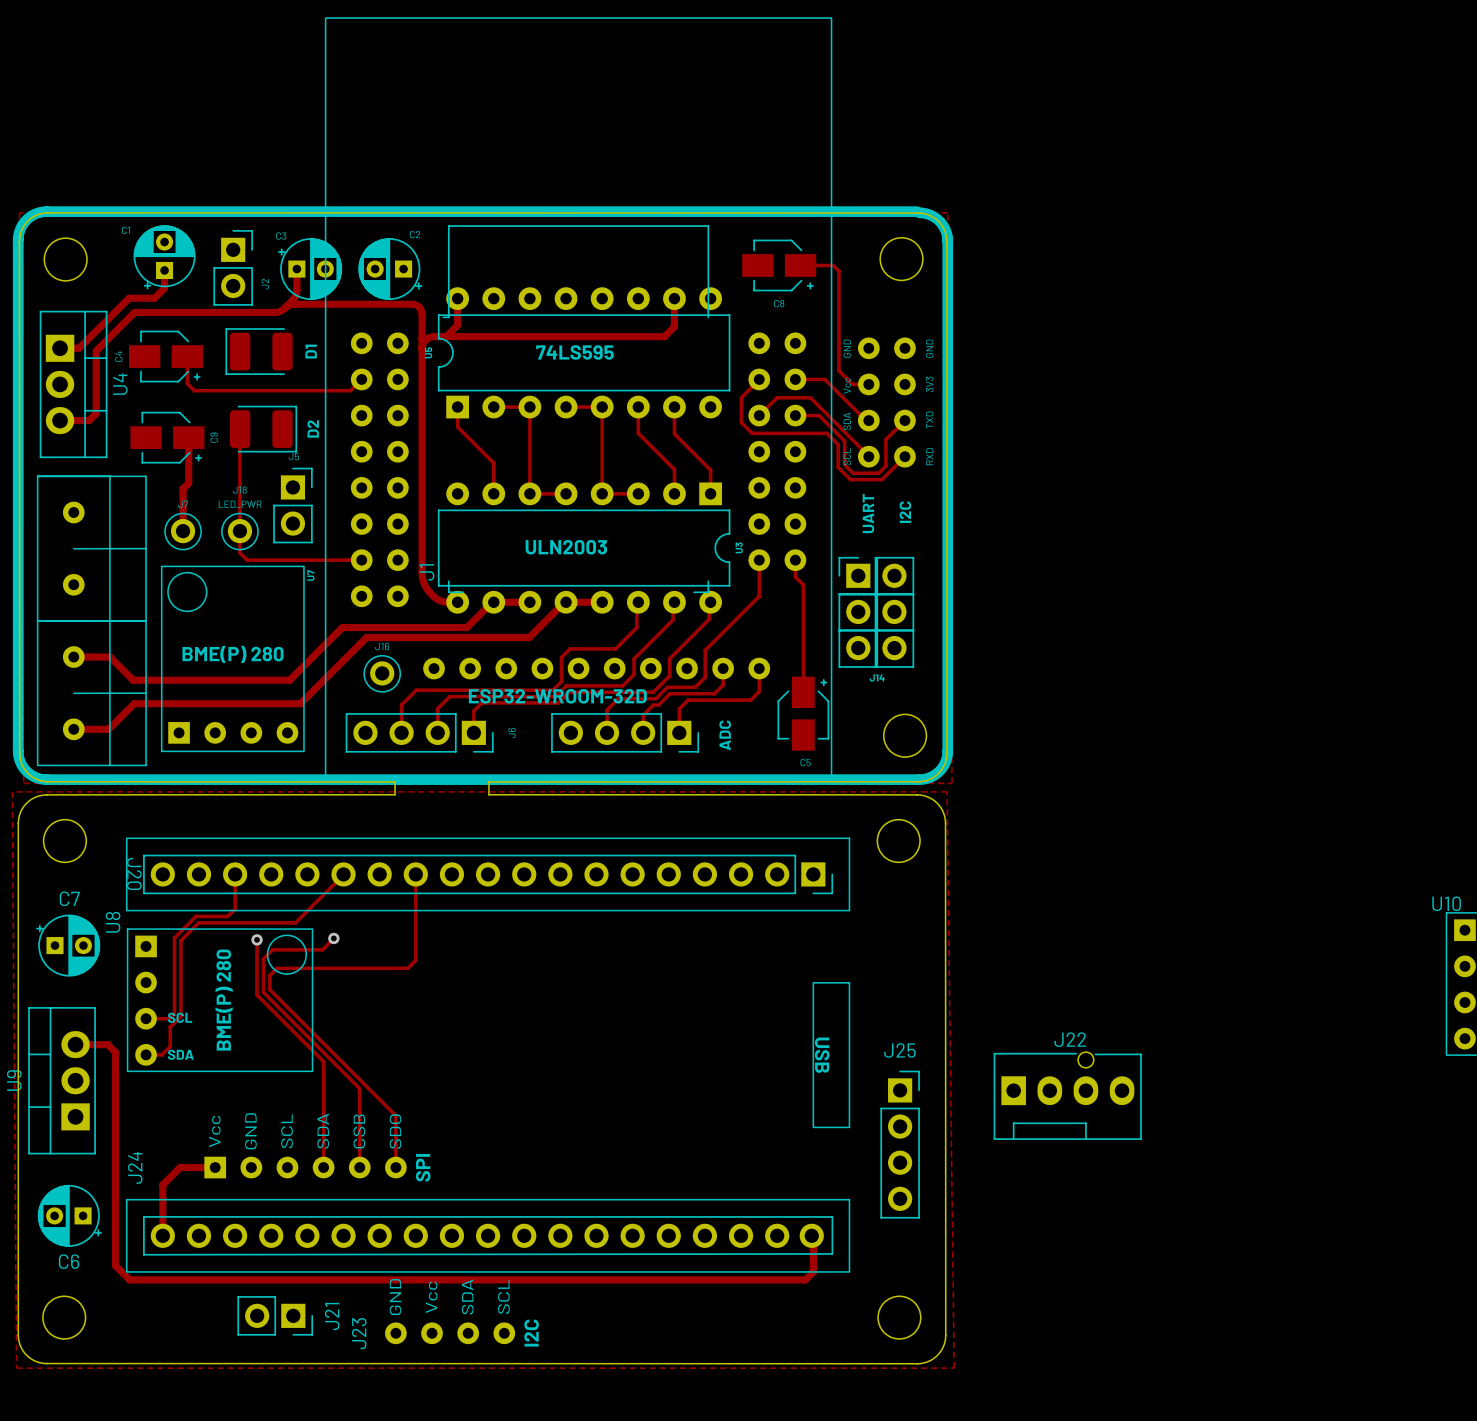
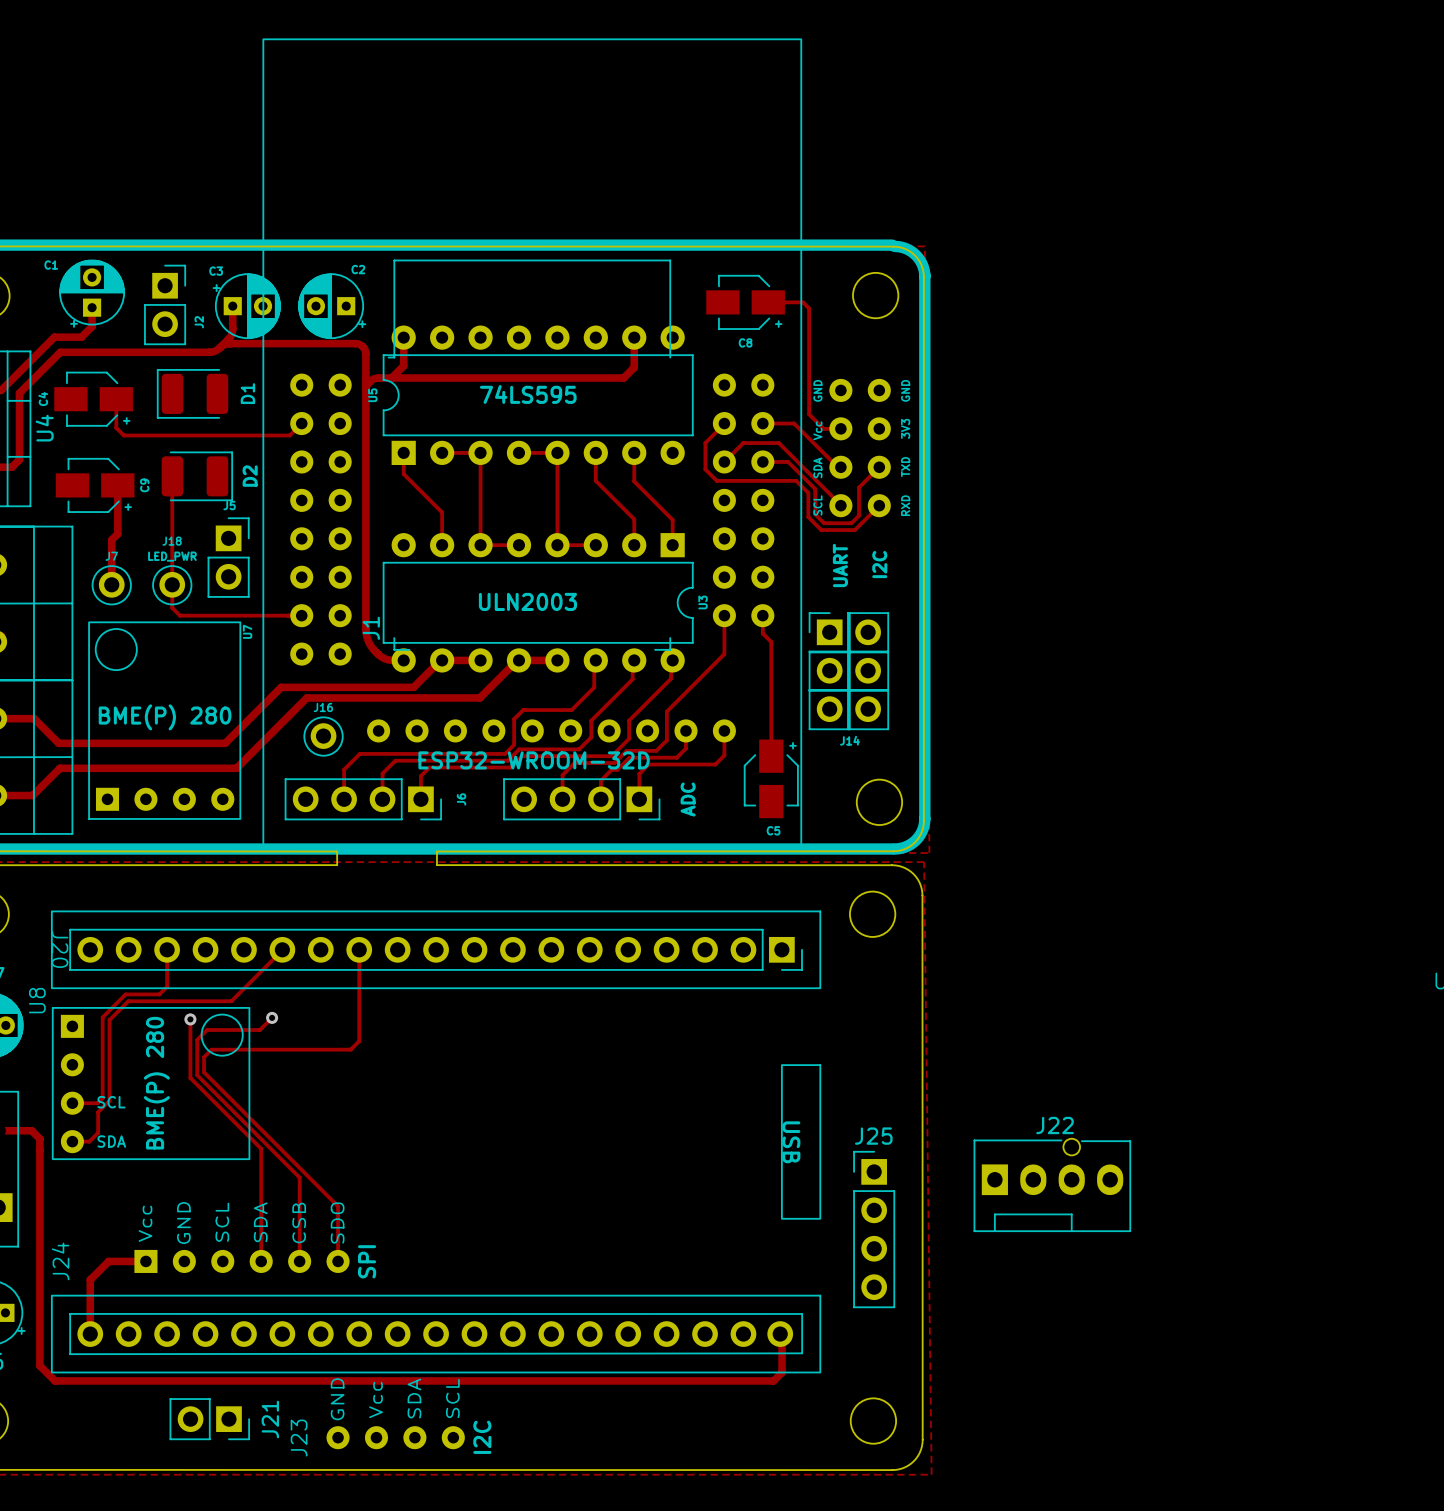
J25 footprint: [880, 1070, 920, 1219] -> [853, 1150, 896, 1309]

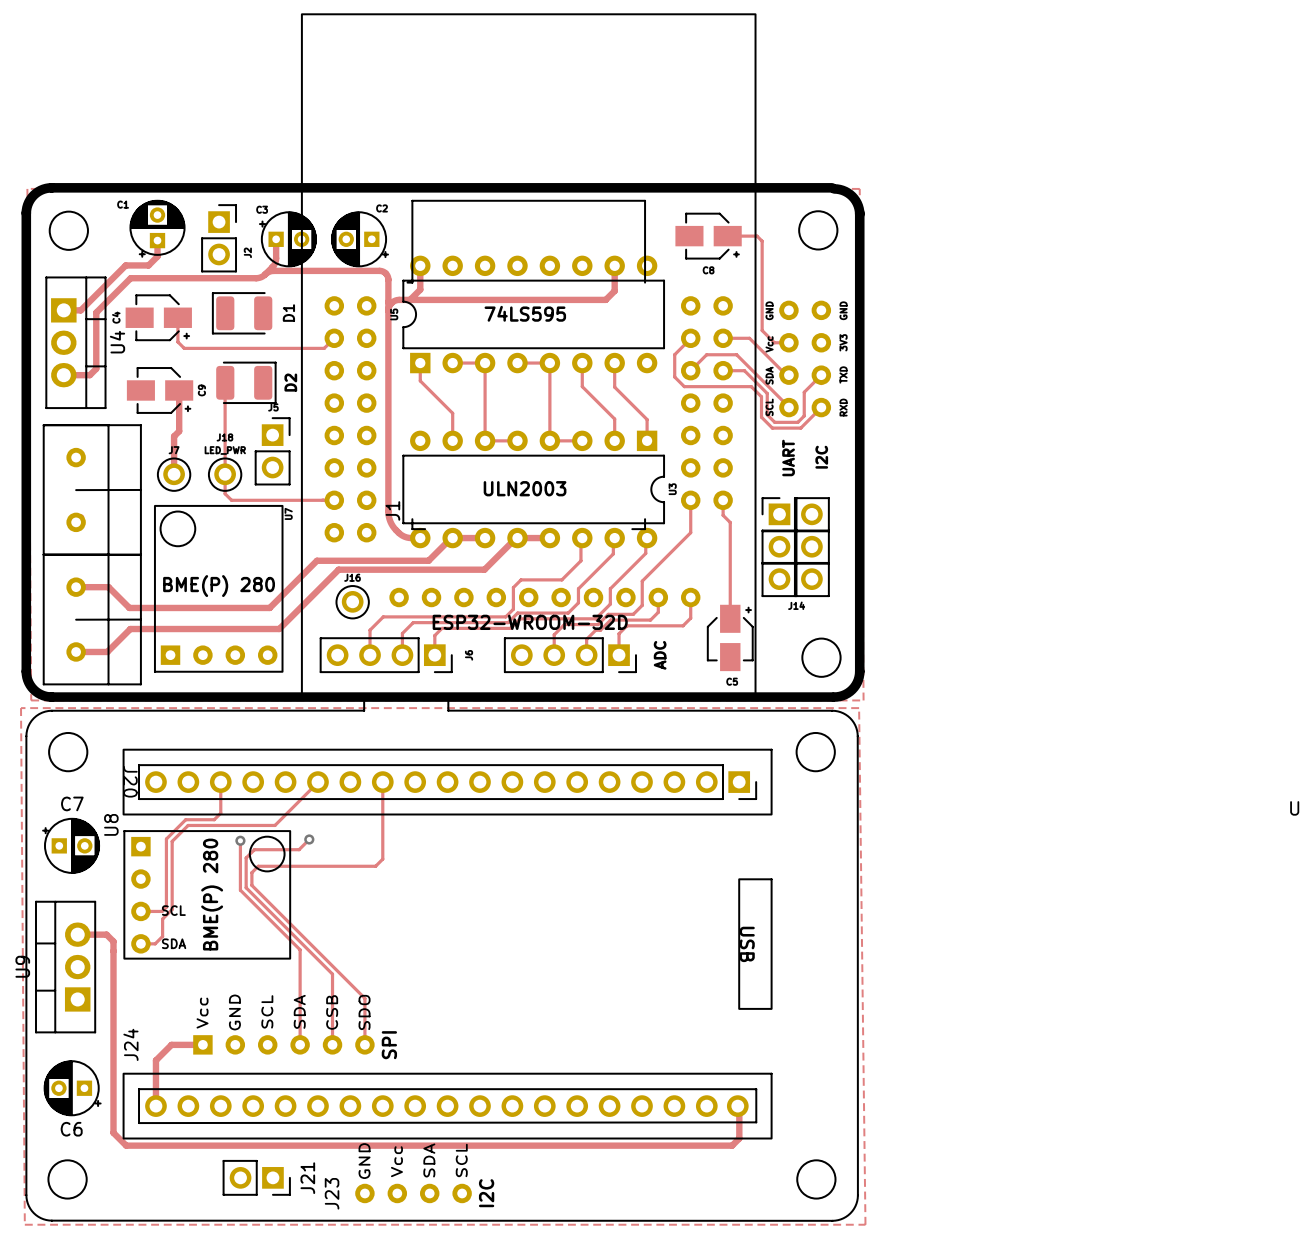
J22: (1052, 1185) -> none
J25: (874, 1229) -> none

